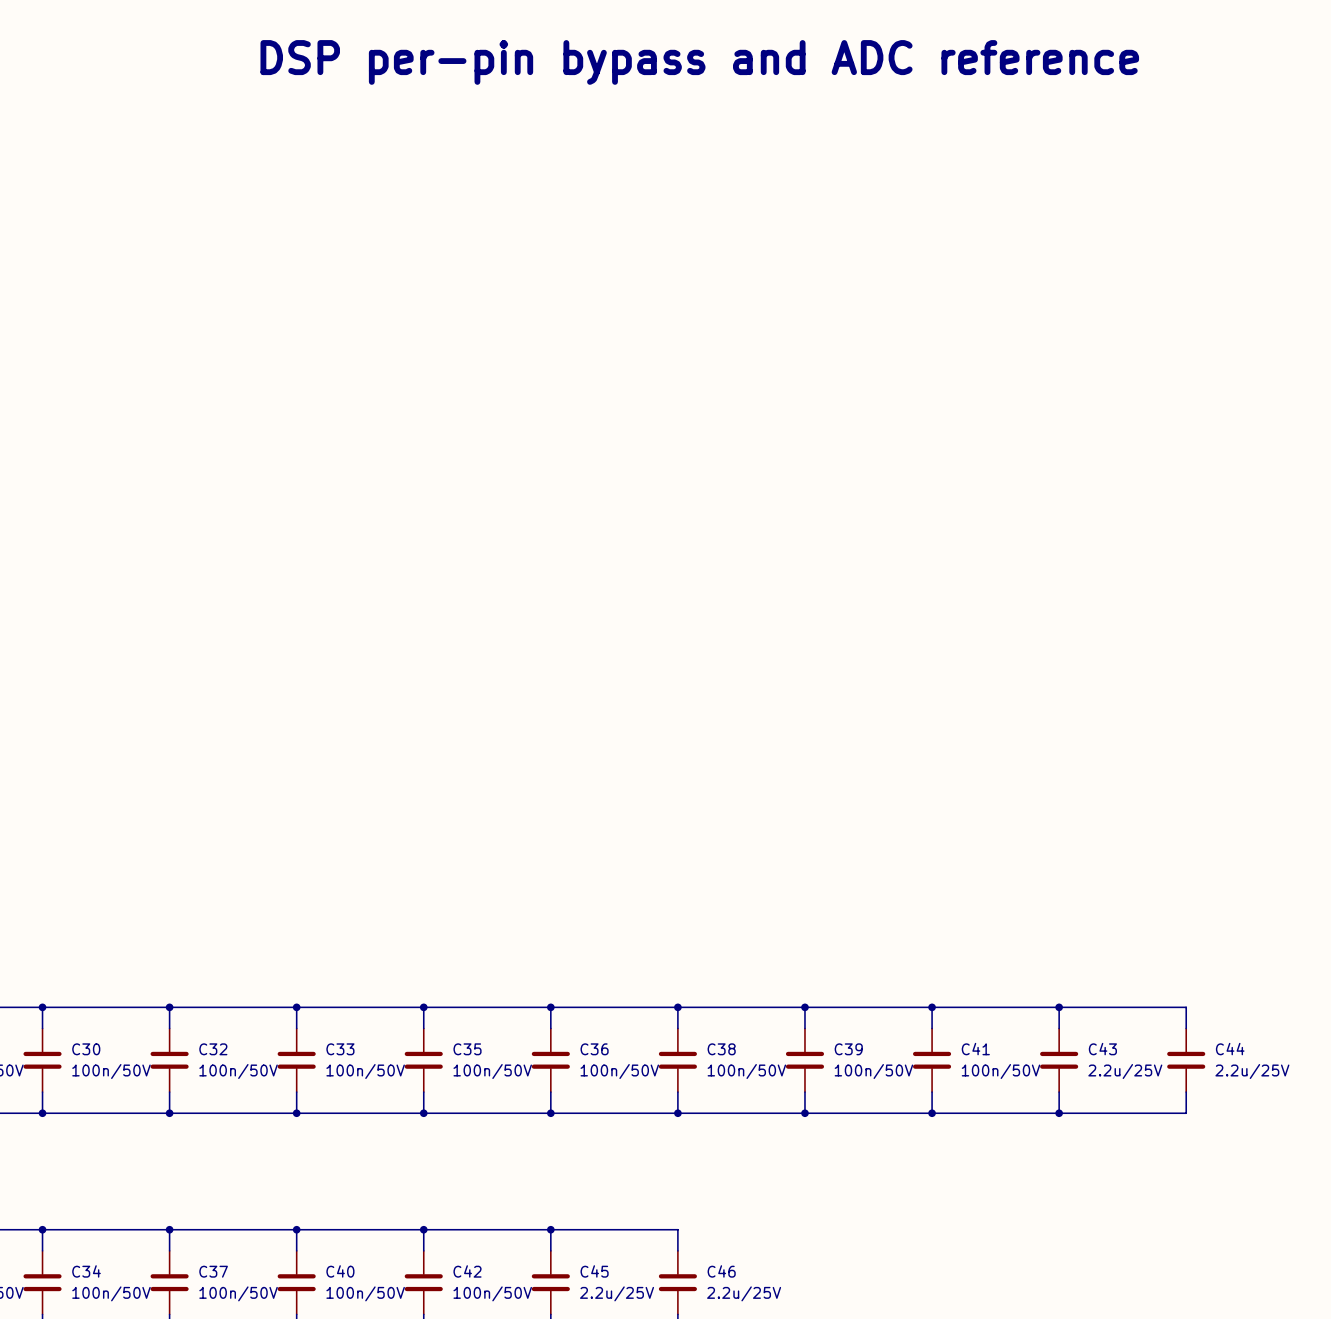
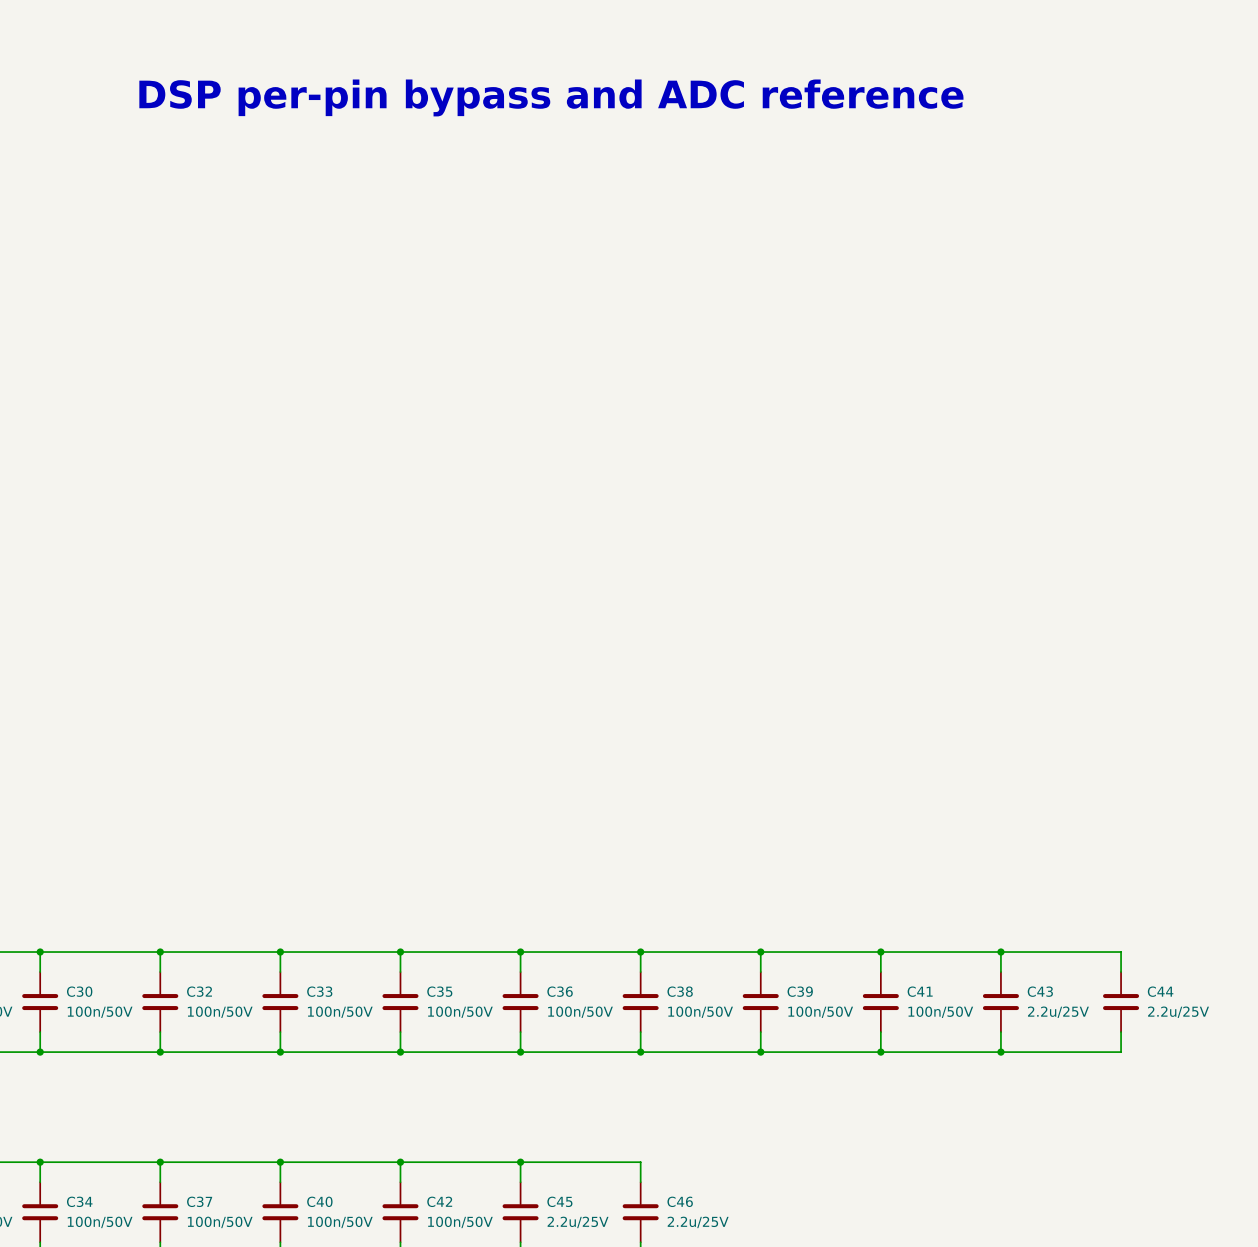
text position: DSP per-pin bypass and ADC reference (699, 62) -> DSP per-pin bypass and ADC reference (551, 97)

